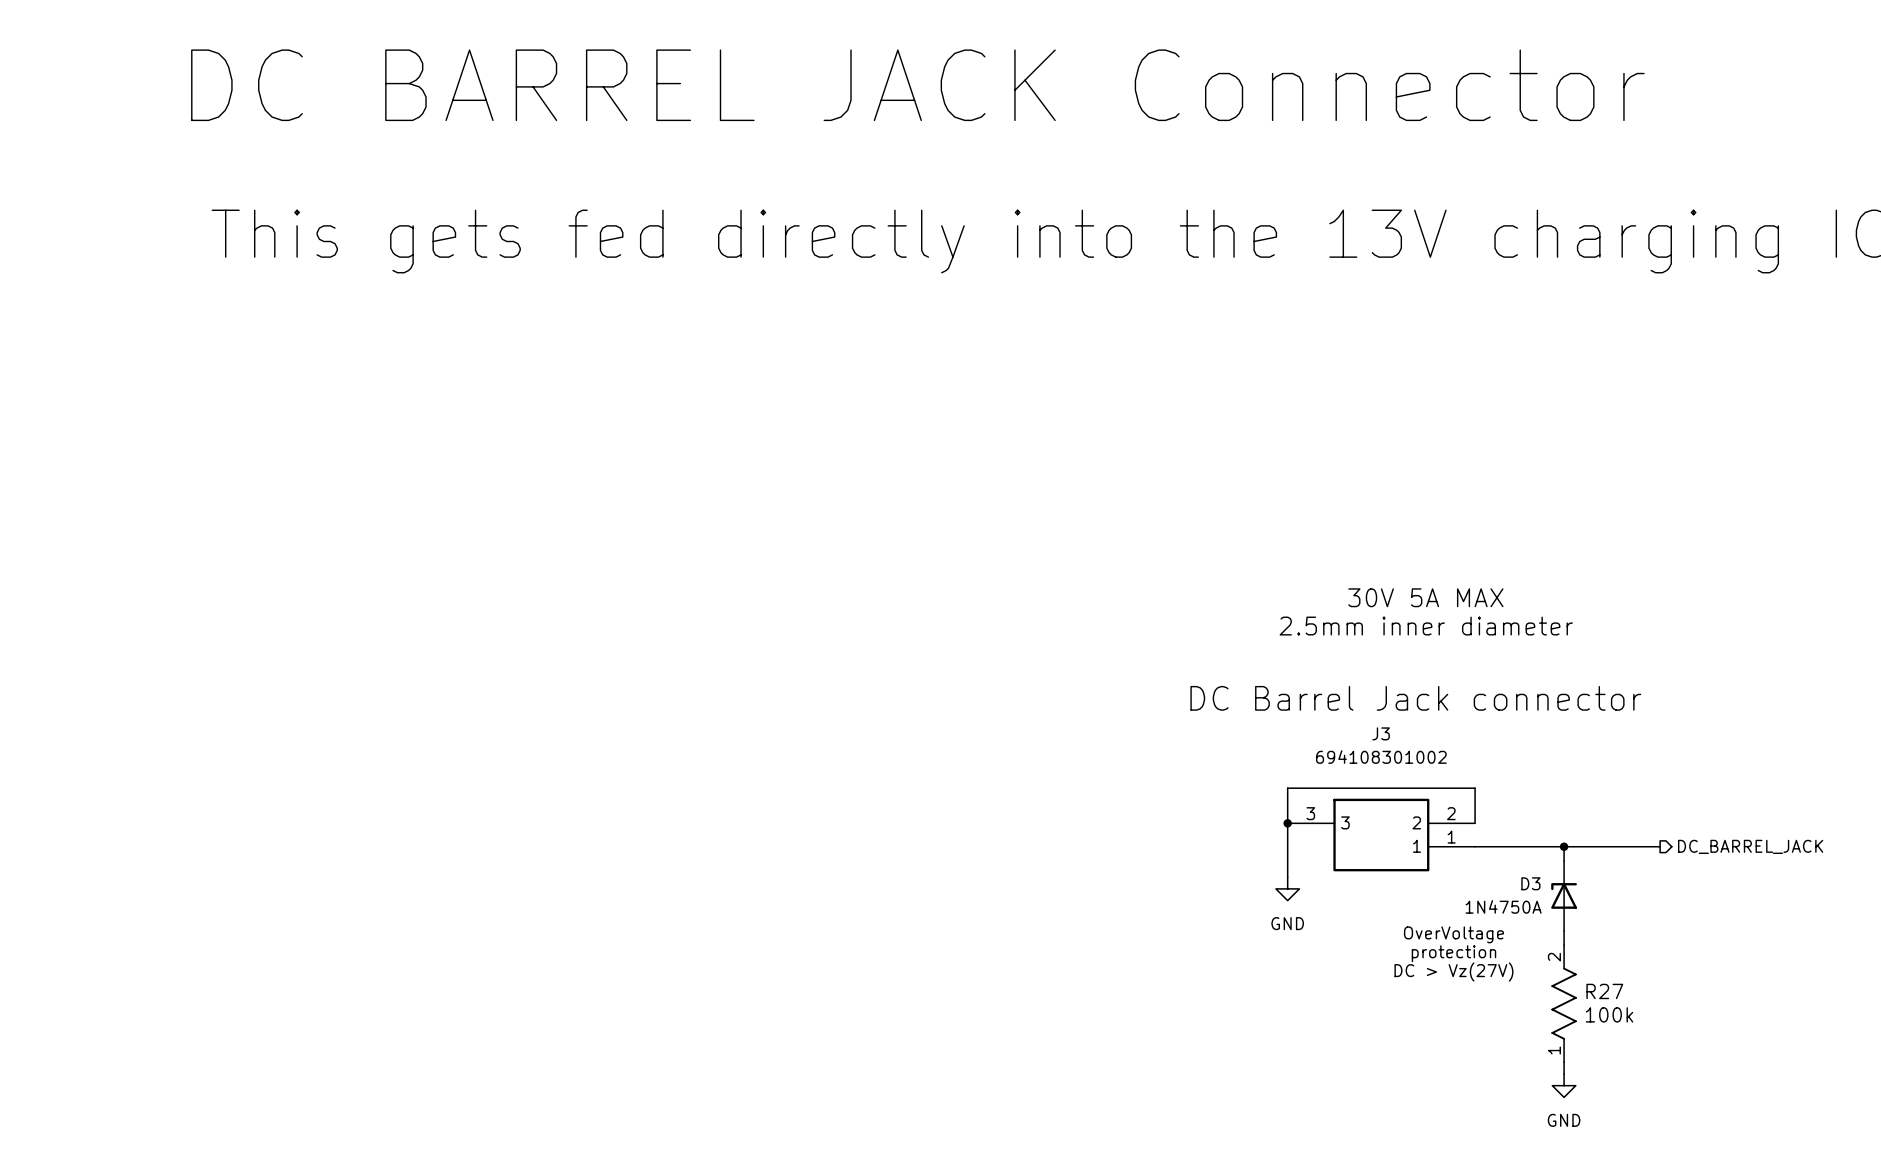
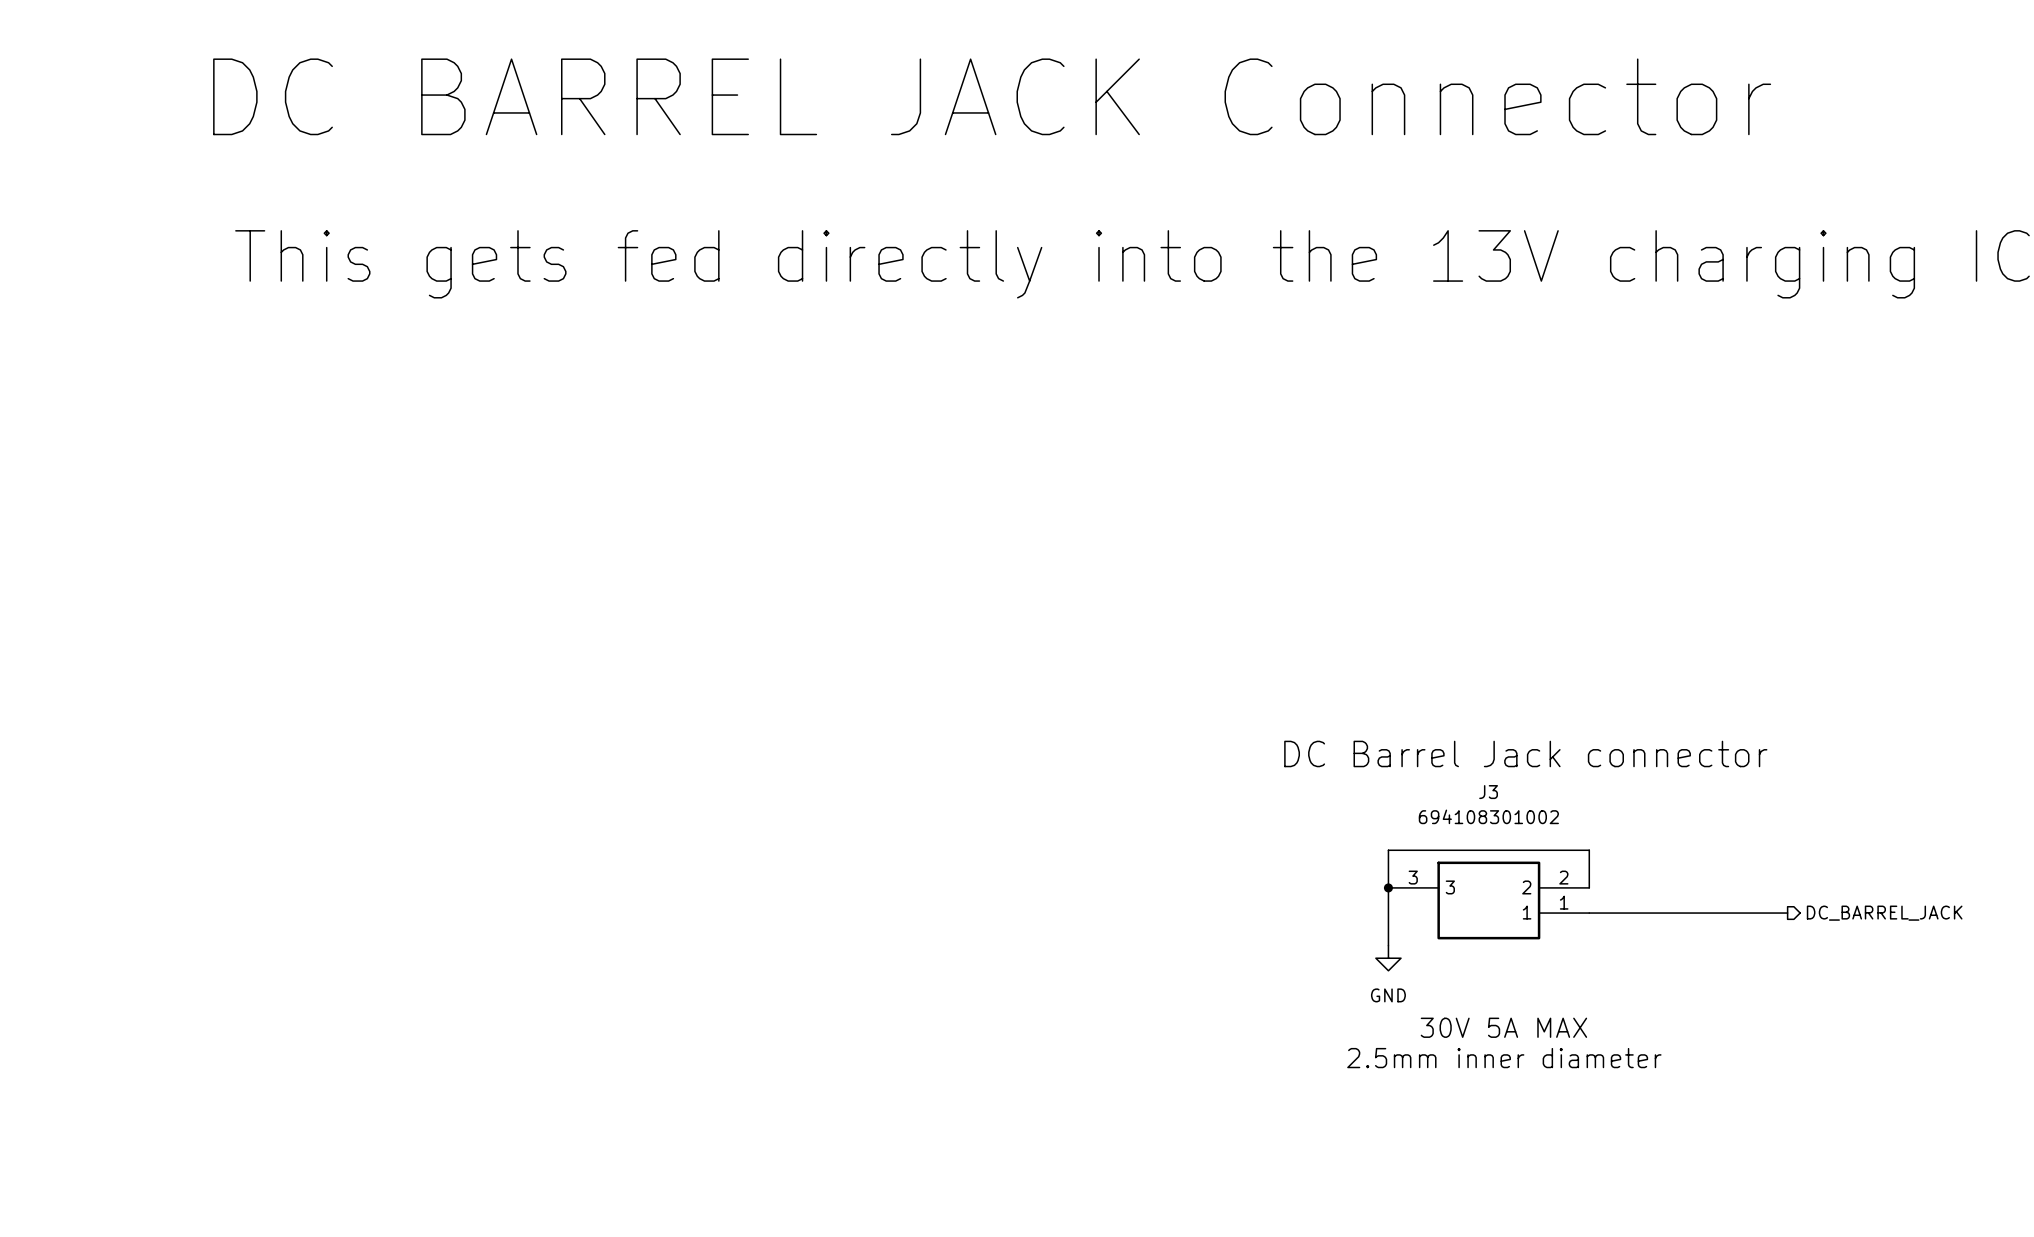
text: 30V 5A MAX (1425, 597) -> none
text: 2.5mm inner diameter (1426, 626) -> none
wire: (1564, 846) (1564, 860) -> none
junction: (1564, 846) -> none
D3: 1N4750A (1564, 895) -> none
wire: (1564, 931) (1564, 945) -> none
text: OverVoltage (1453, 934) -> none
text: none -> 30V 5A MAX (1503, 1027)
text: protection (1453, 953) -> none
text: DC > Vz(27V) (1453, 972) -> none
text: none -> 2.5mm inner diameter (1504, 1058)
R27: 100k (1564, 1003) -> none
wire: (1564, 1062) (1564, 1073) -> none
power symbol: GND (1564, 1085) -> none

